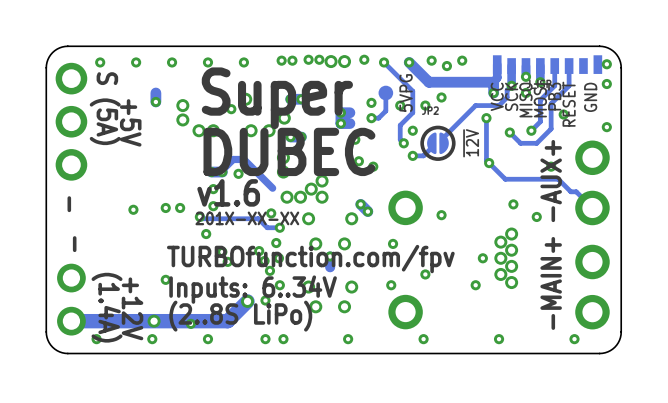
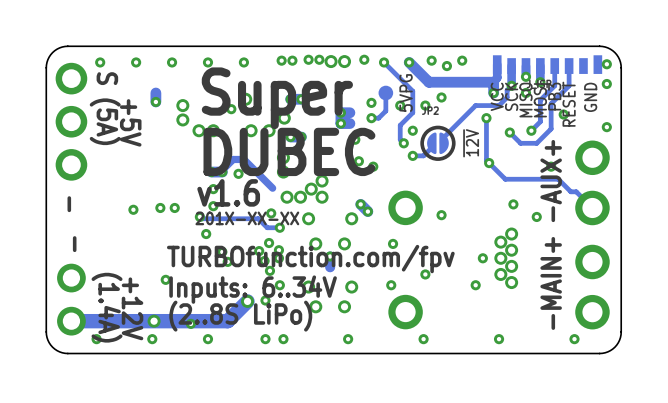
via: none -> (160, 207)
via: (165, 207) -> none
via: none -> (174, 207)
via: (180, 207) -> none
via: none -> (269, 243)
via: (276, 243) -> none
via: none -> (278, 250)

